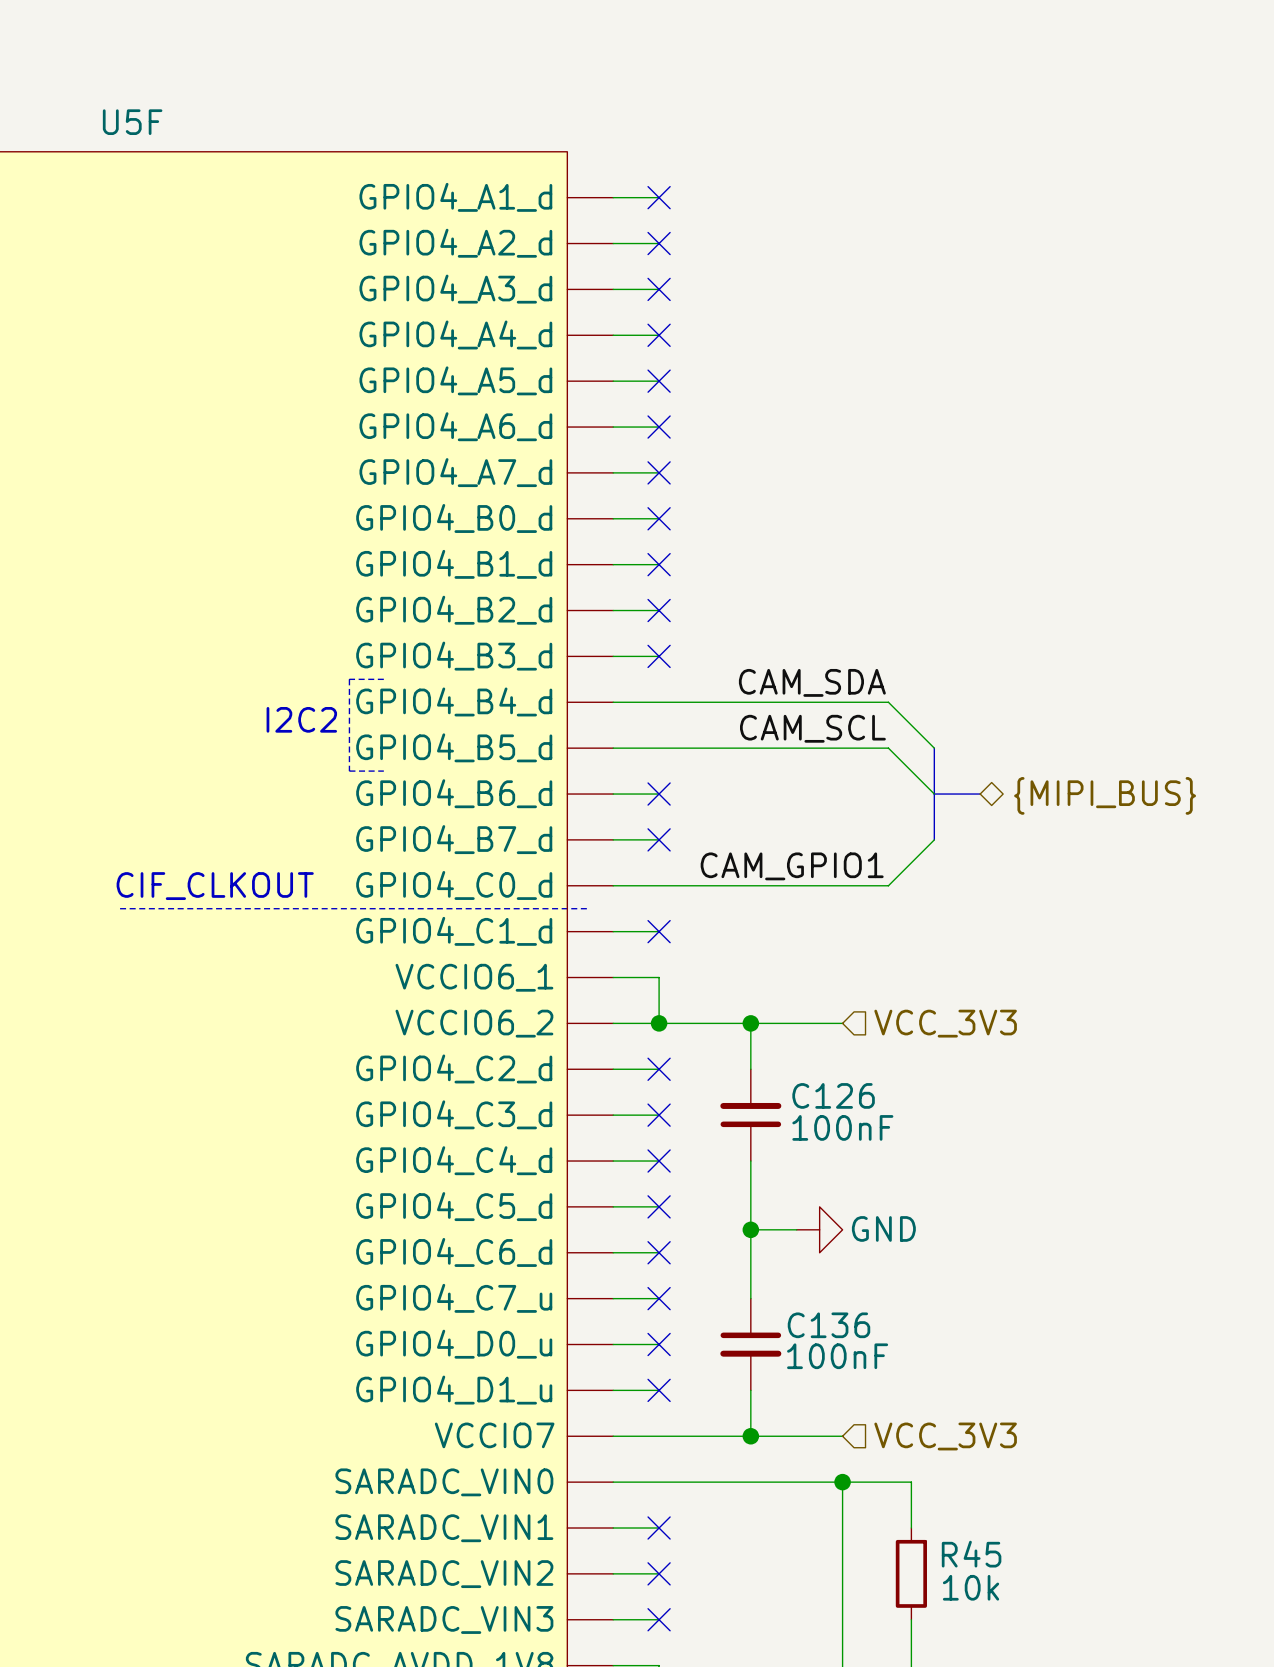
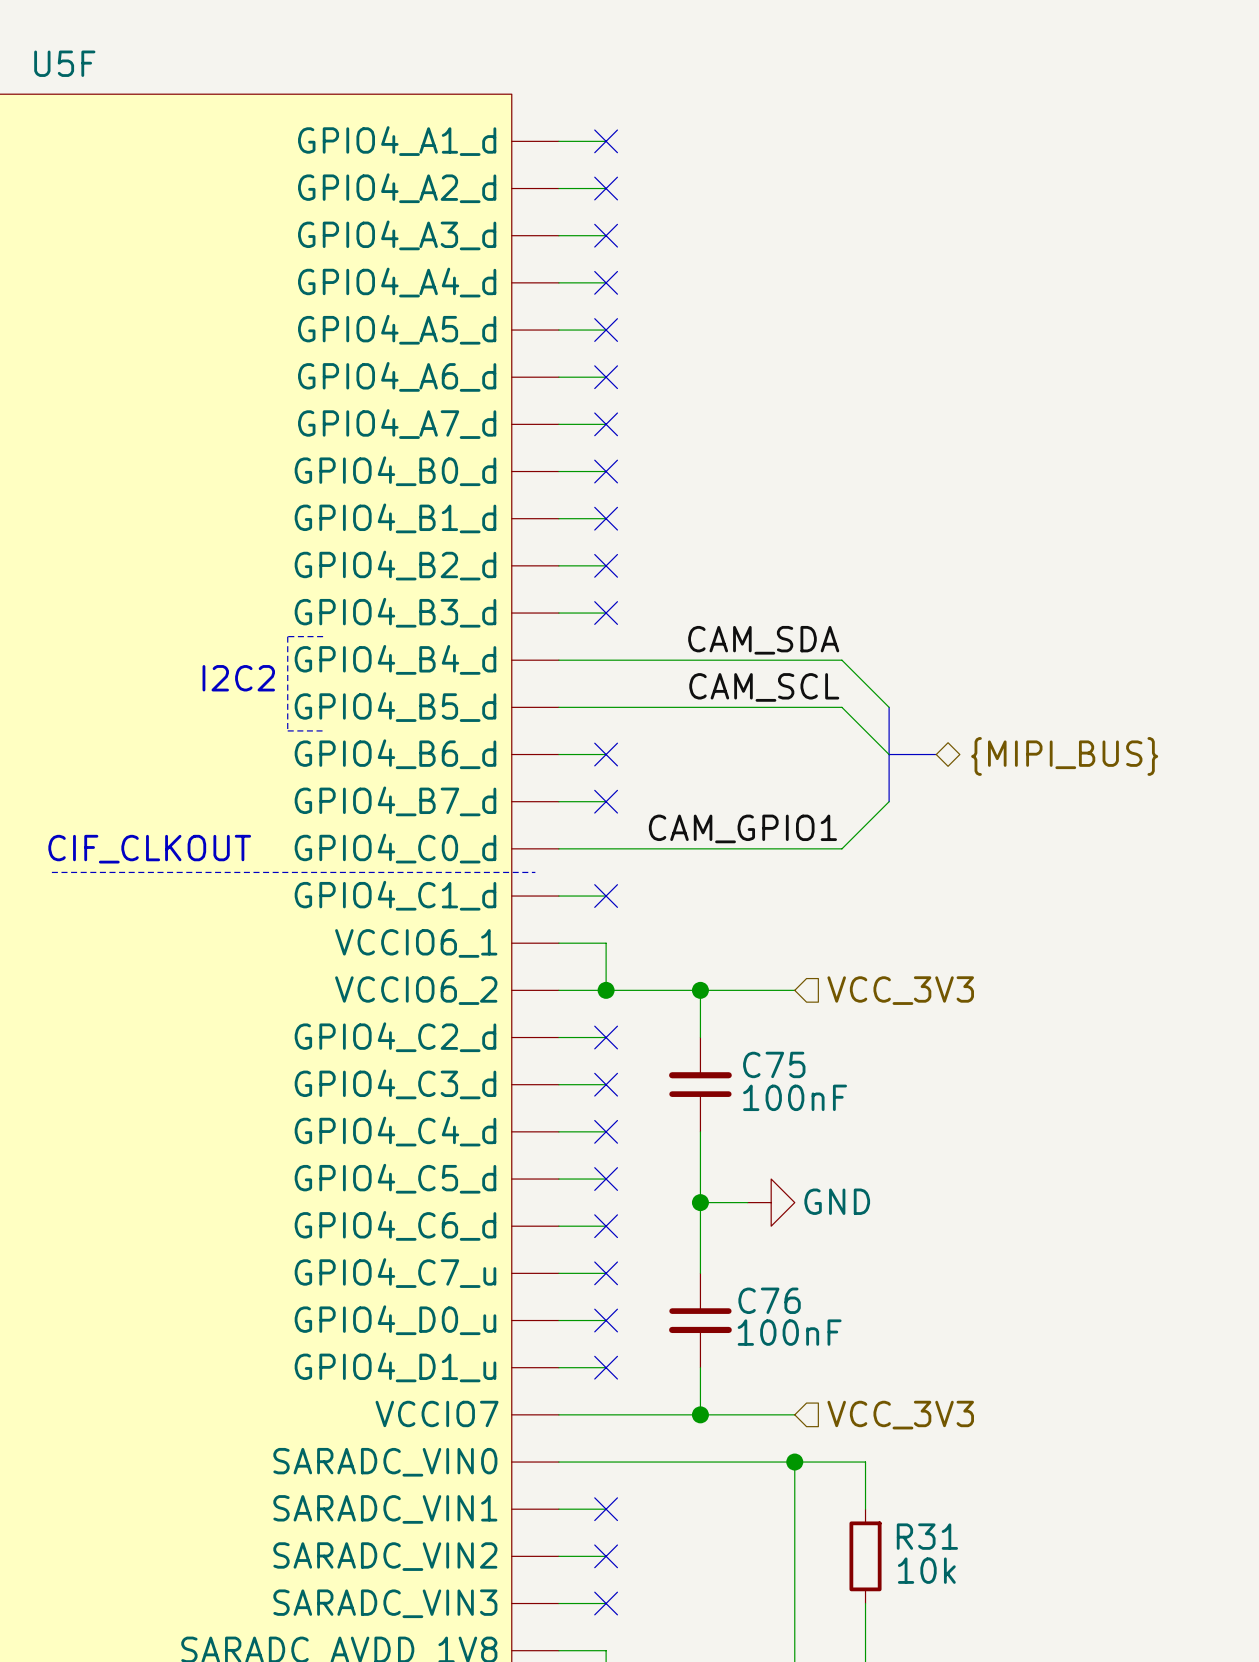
C126 name: C126 (833, 1095) -> C75 (774, 1064)
C136 name: C136 (828, 1325) -> C76 (769, 1300)
R45 name: R45 (971, 1554) -> R31 (927, 1536)

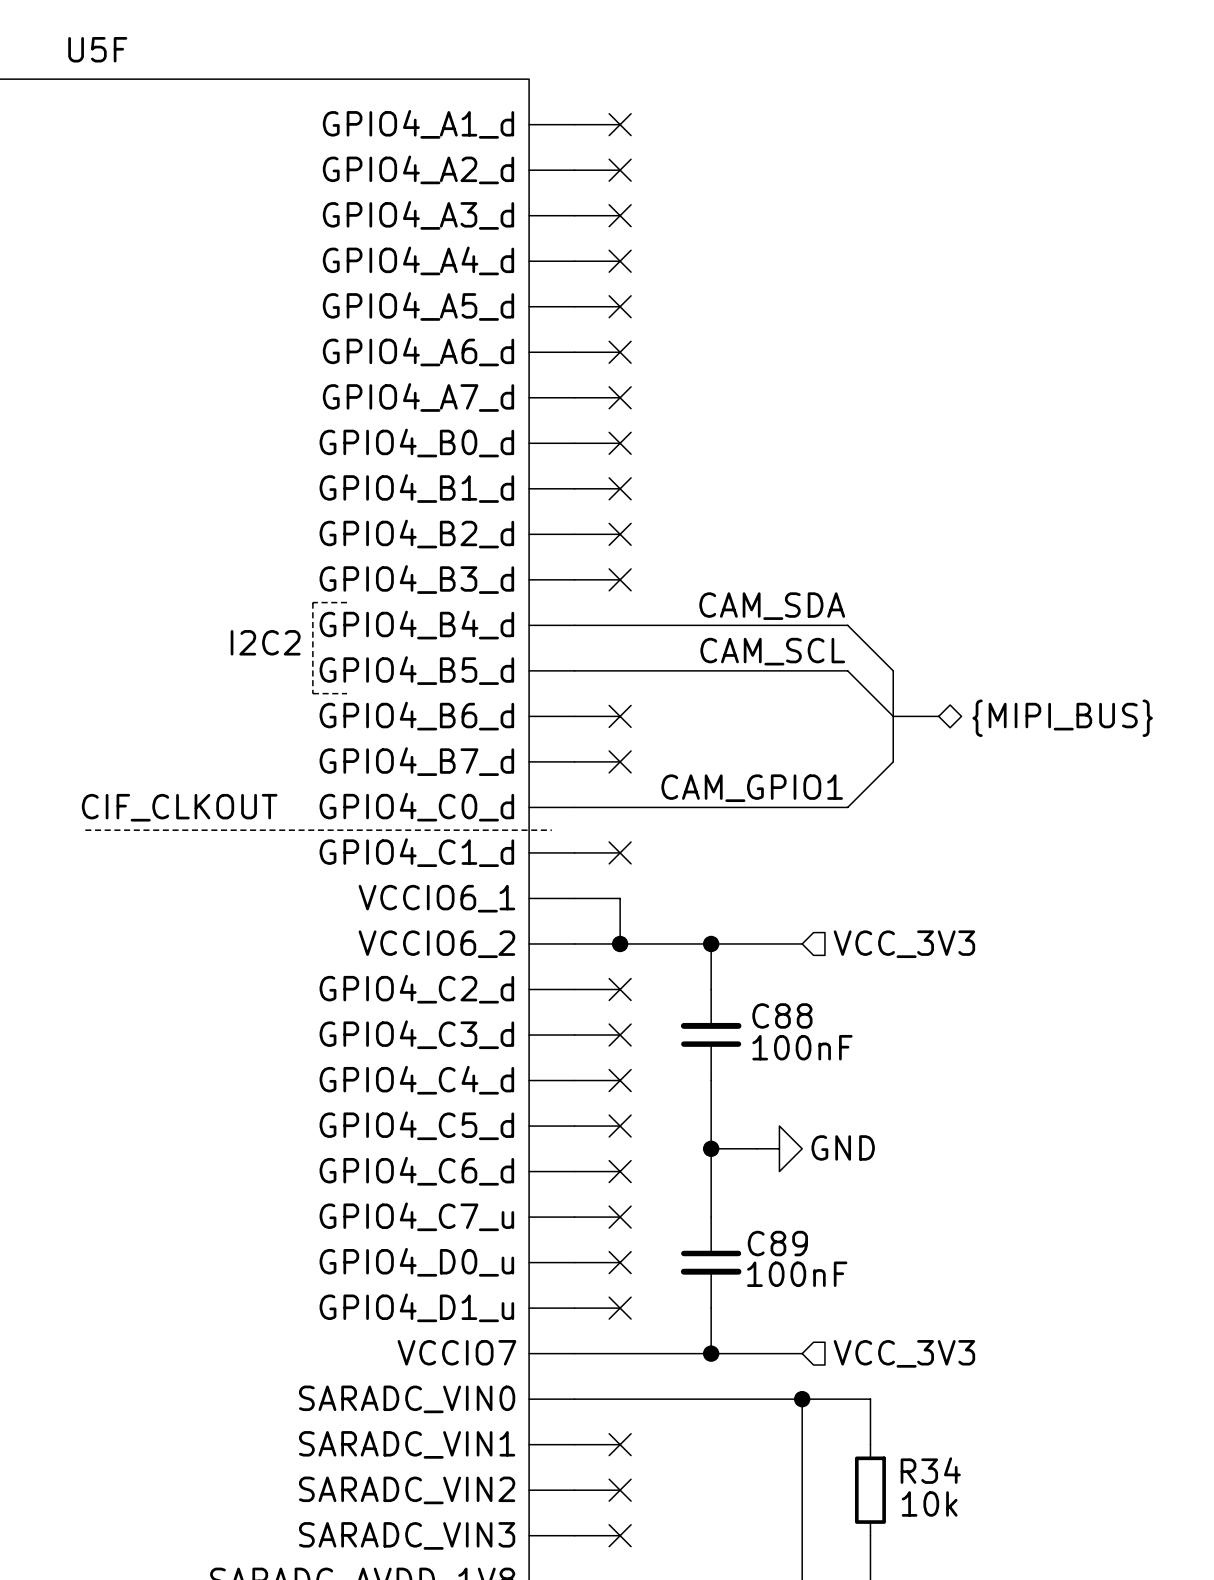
C75 name: C75 (774, 1064) -> C88 (782, 1015)
C76 name: C76 (769, 1300) -> C89 (777, 1243)
R31 name: R31 (927, 1536) -> R34 (930, 1470)

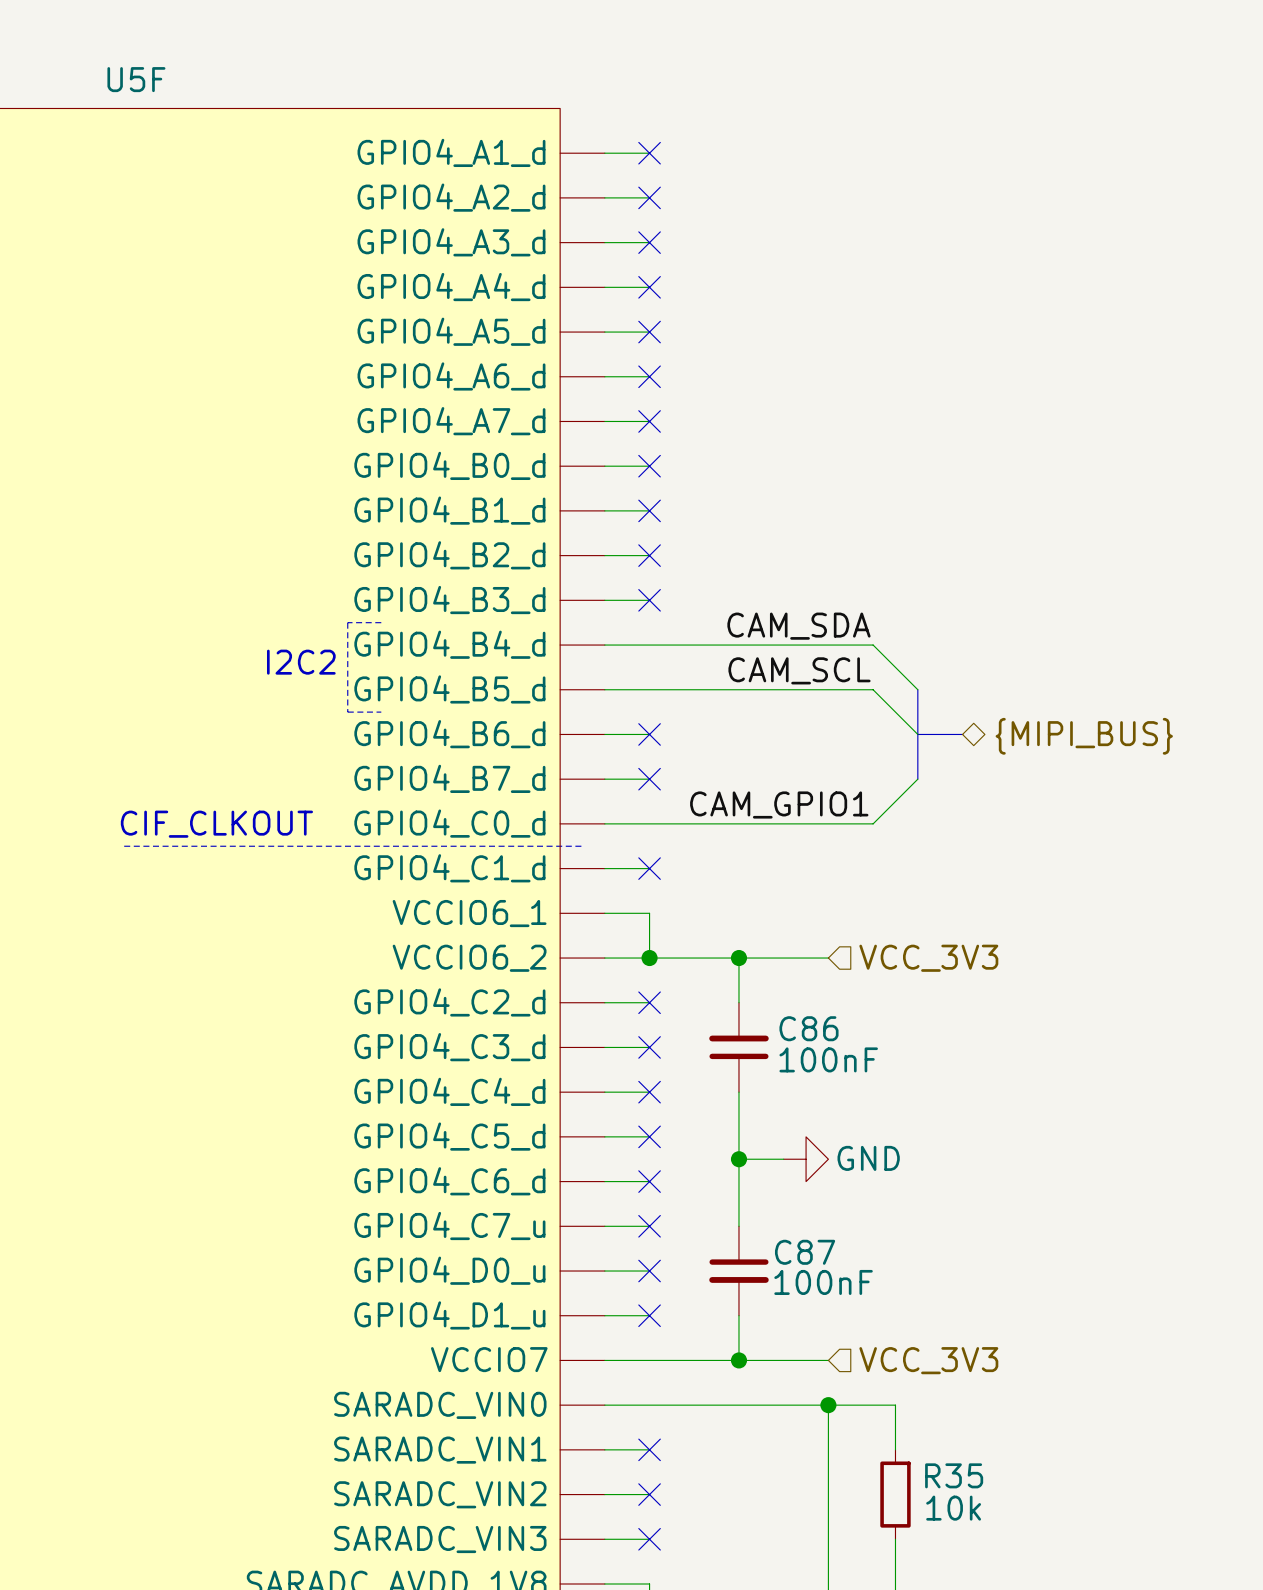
C88 name: C88 (782, 1015) -> C86 (808, 1028)
C89 name: C89 (777, 1243) -> C87 (805, 1252)
R34 name: R34 (930, 1470) -> R35 (954, 1475)

